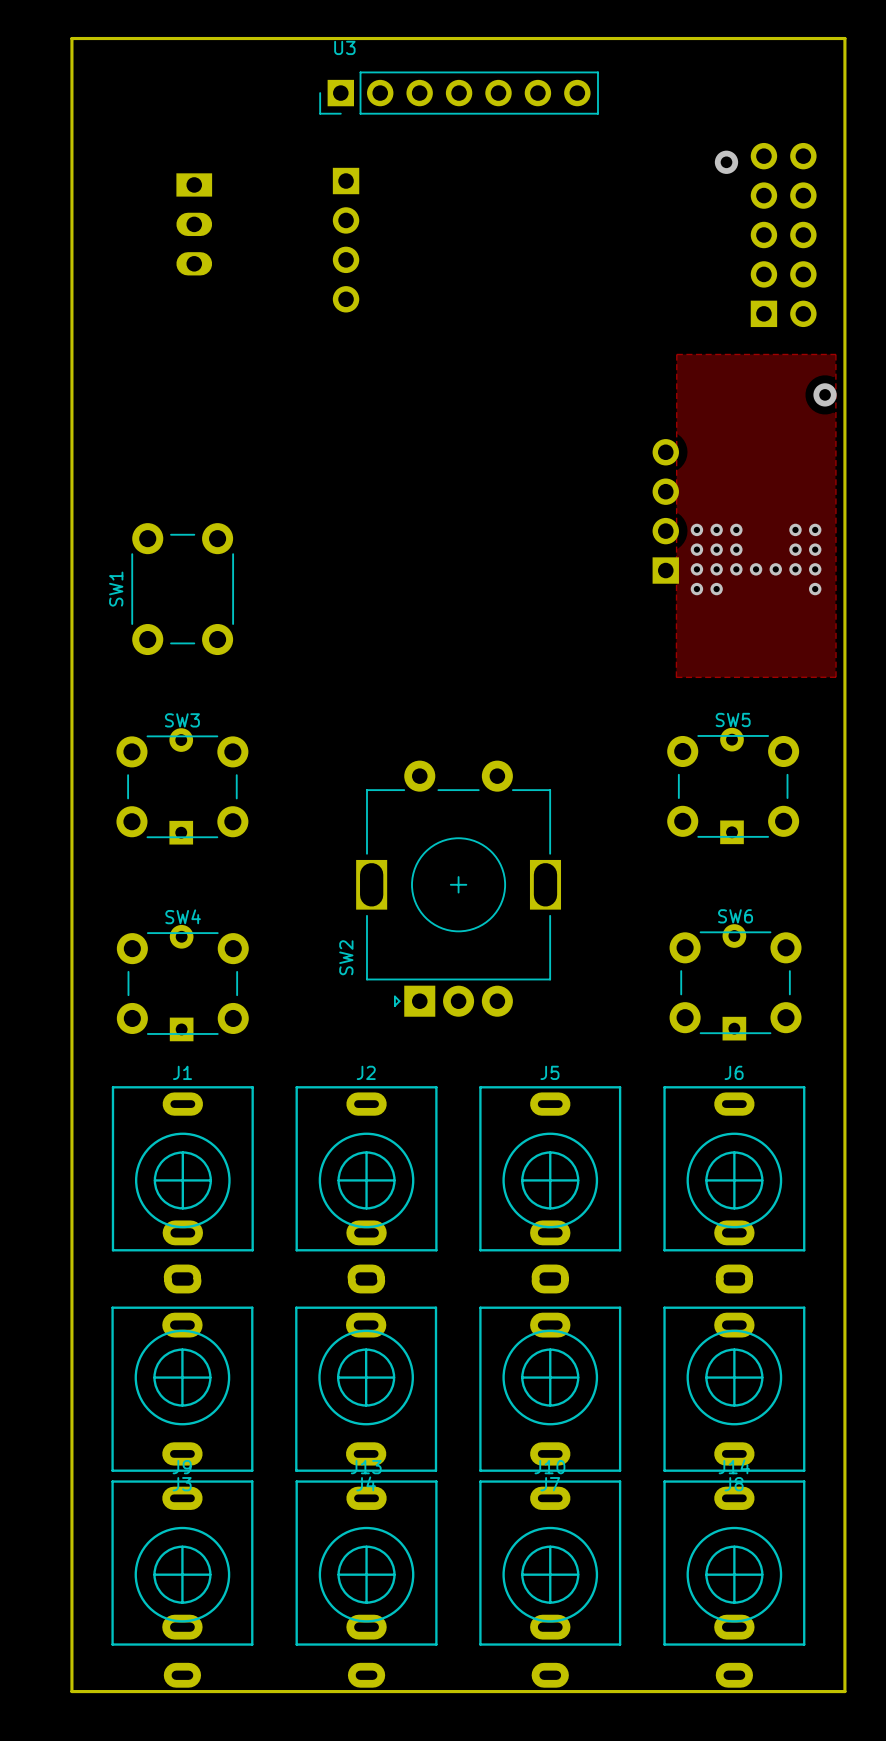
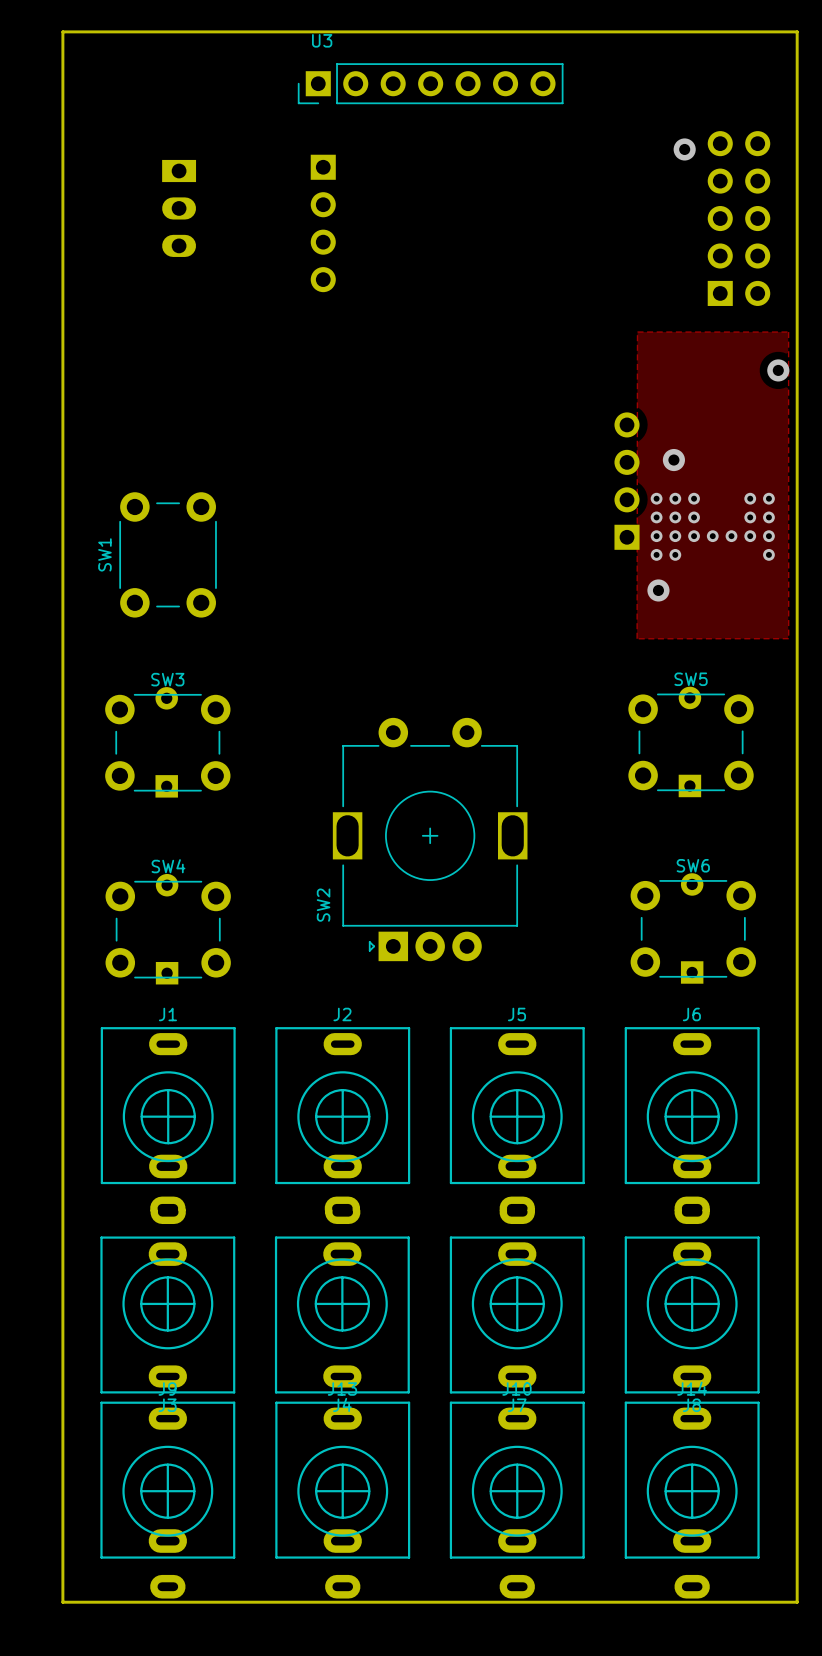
via: none -> (673, 460)
via: none -> (658, 590)

